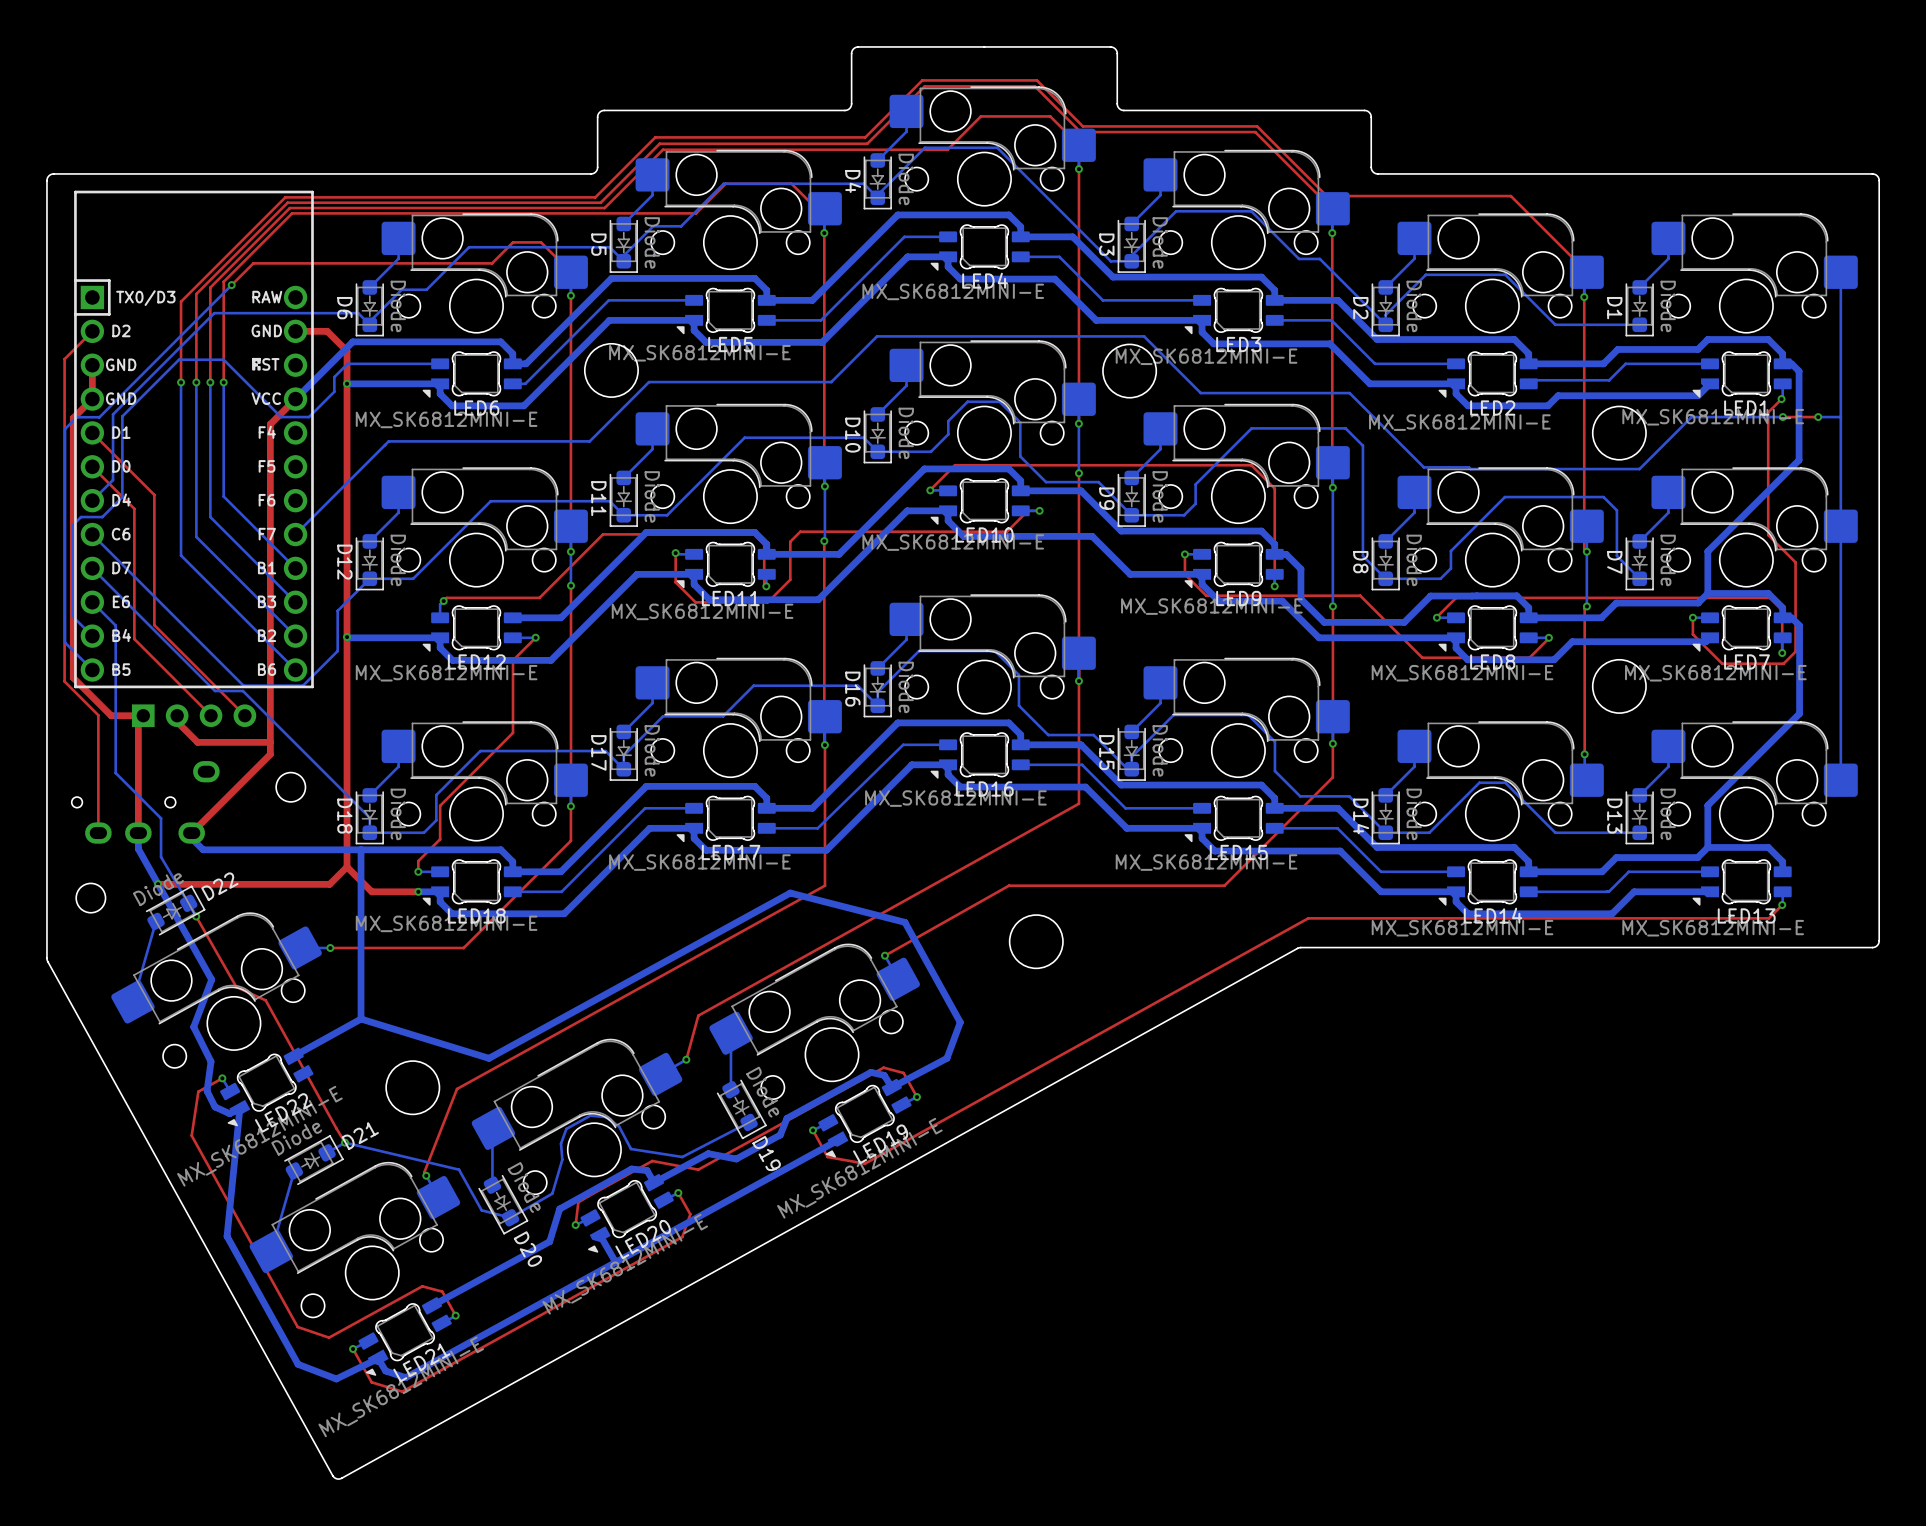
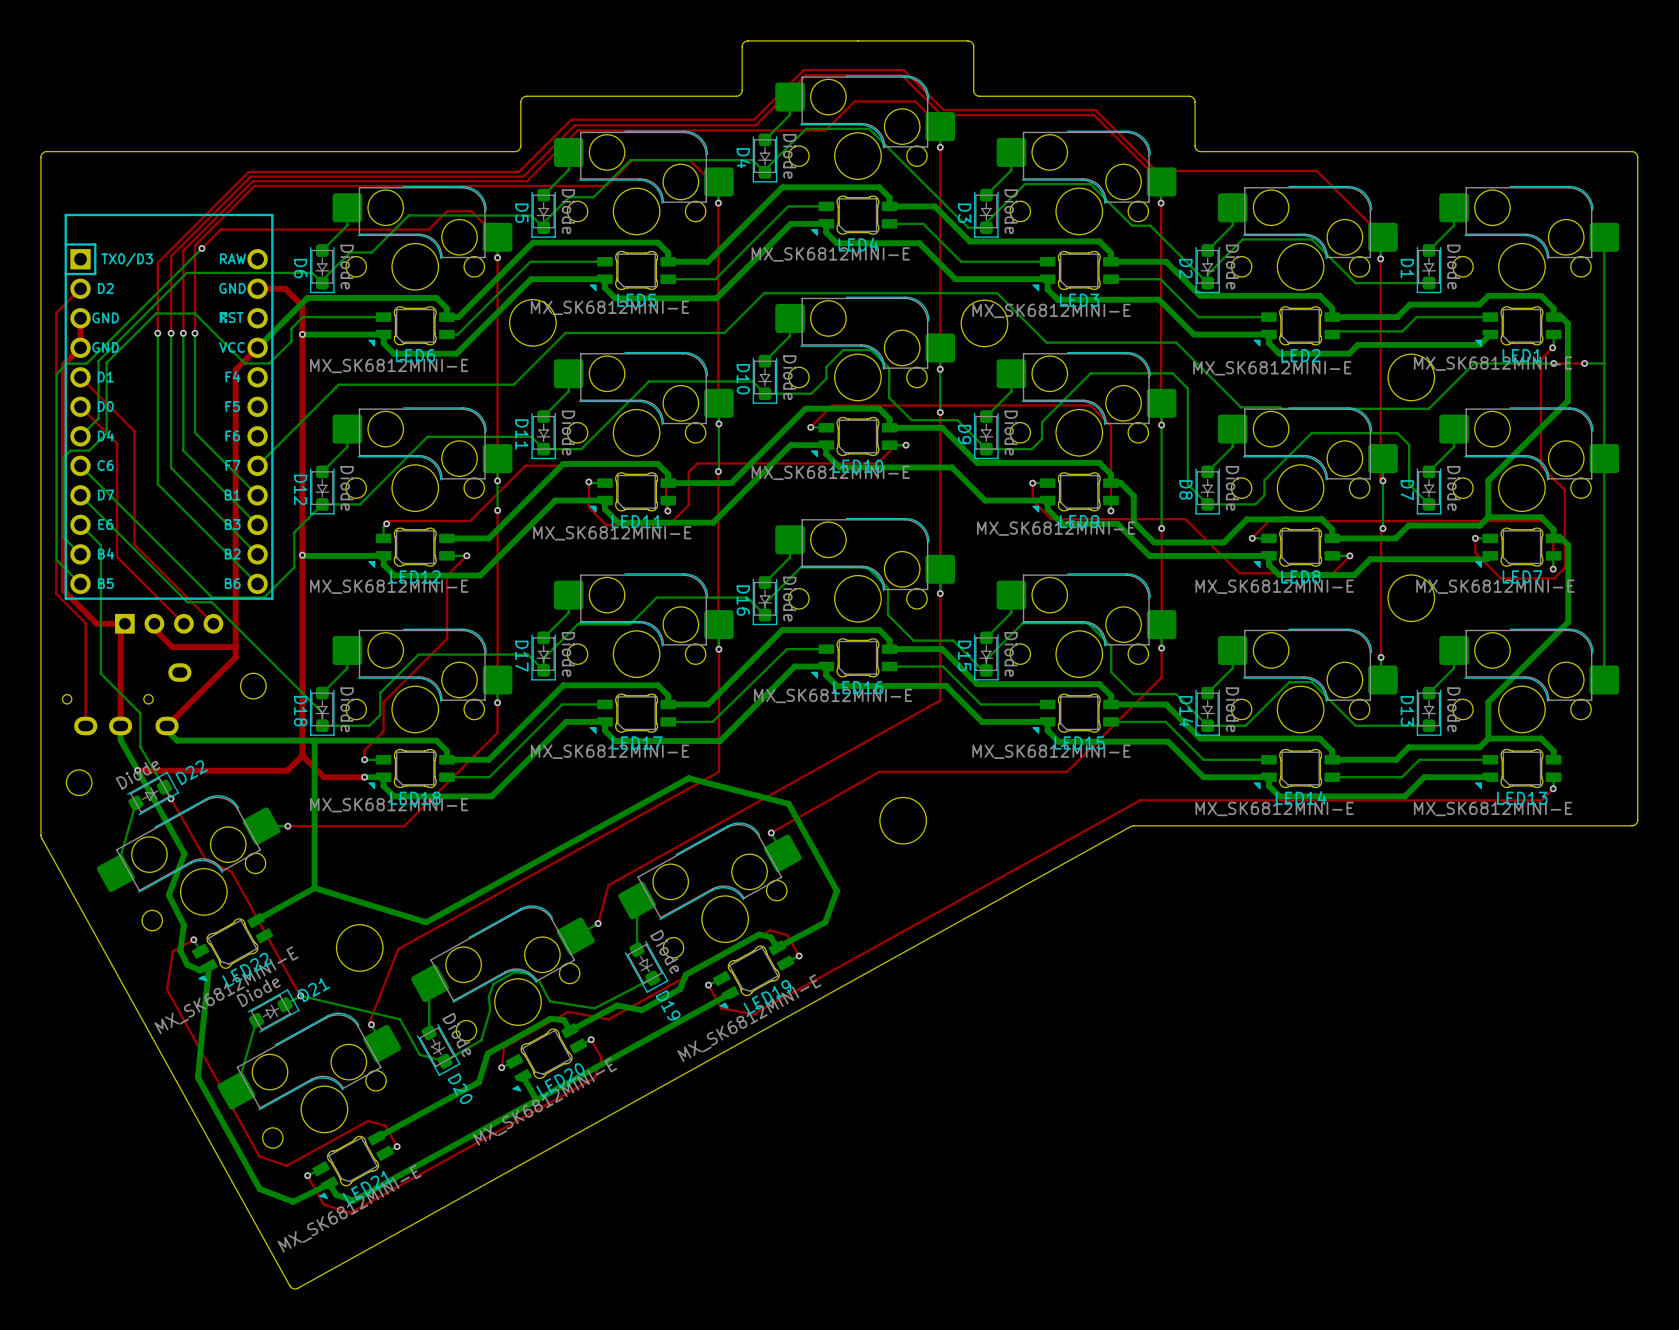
part: (193, 439) -> none
part: none -> (169, 406)

